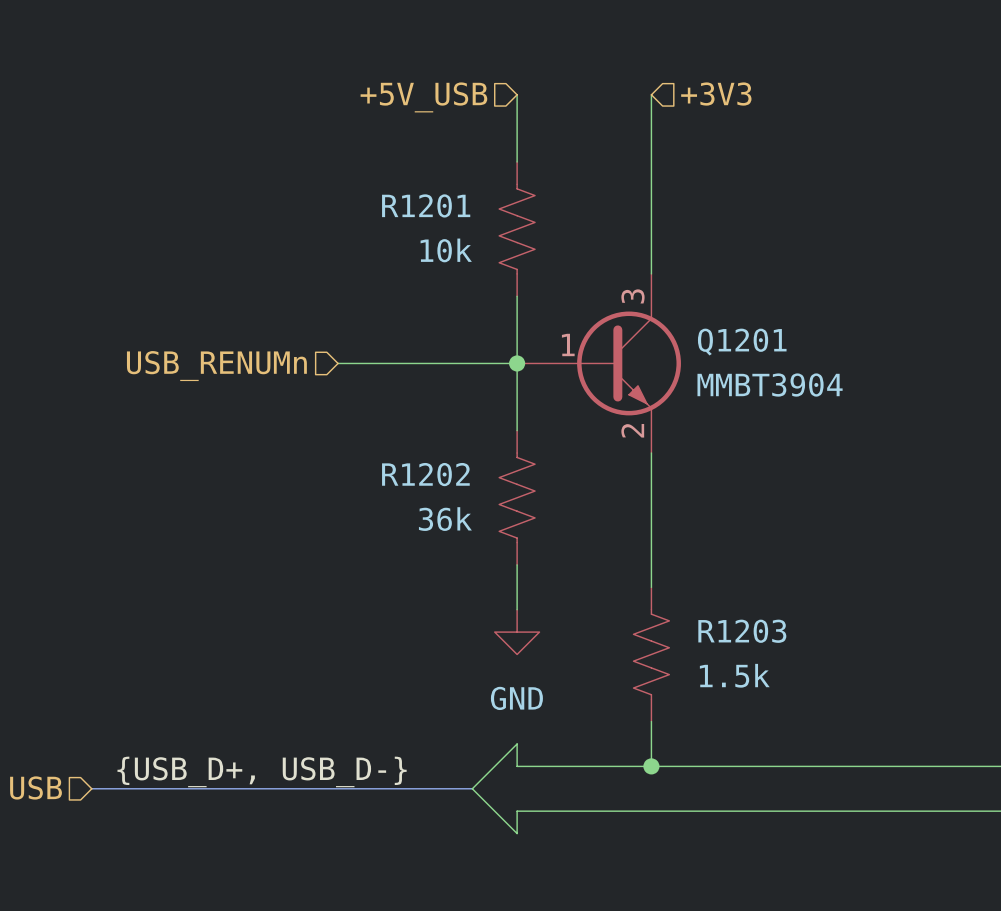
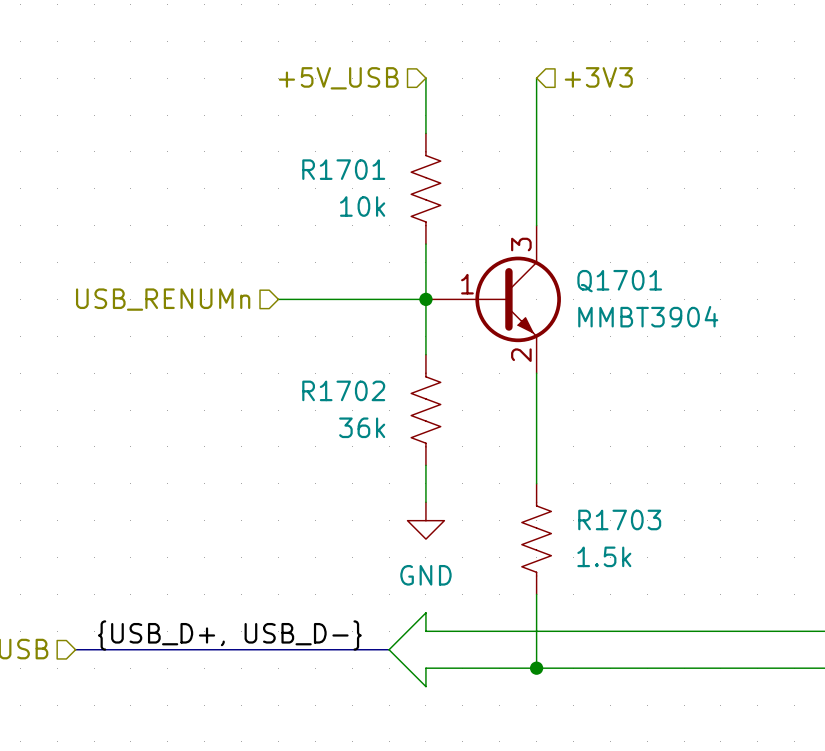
R1201 name: R1201 (426, 205) -> R1701 (343, 169)
Q1201 name: Q1201 (742, 342) -> Q1701 (619, 281)
R1202 name: R1202 (425, 474) -> R1702 (343, 390)
R1203 name: R1203 (742, 631) -> R1703 (619, 519)
wire: none -> (536, 631) (536, 668)
junction position: (651, 766) -> (536, 668)

